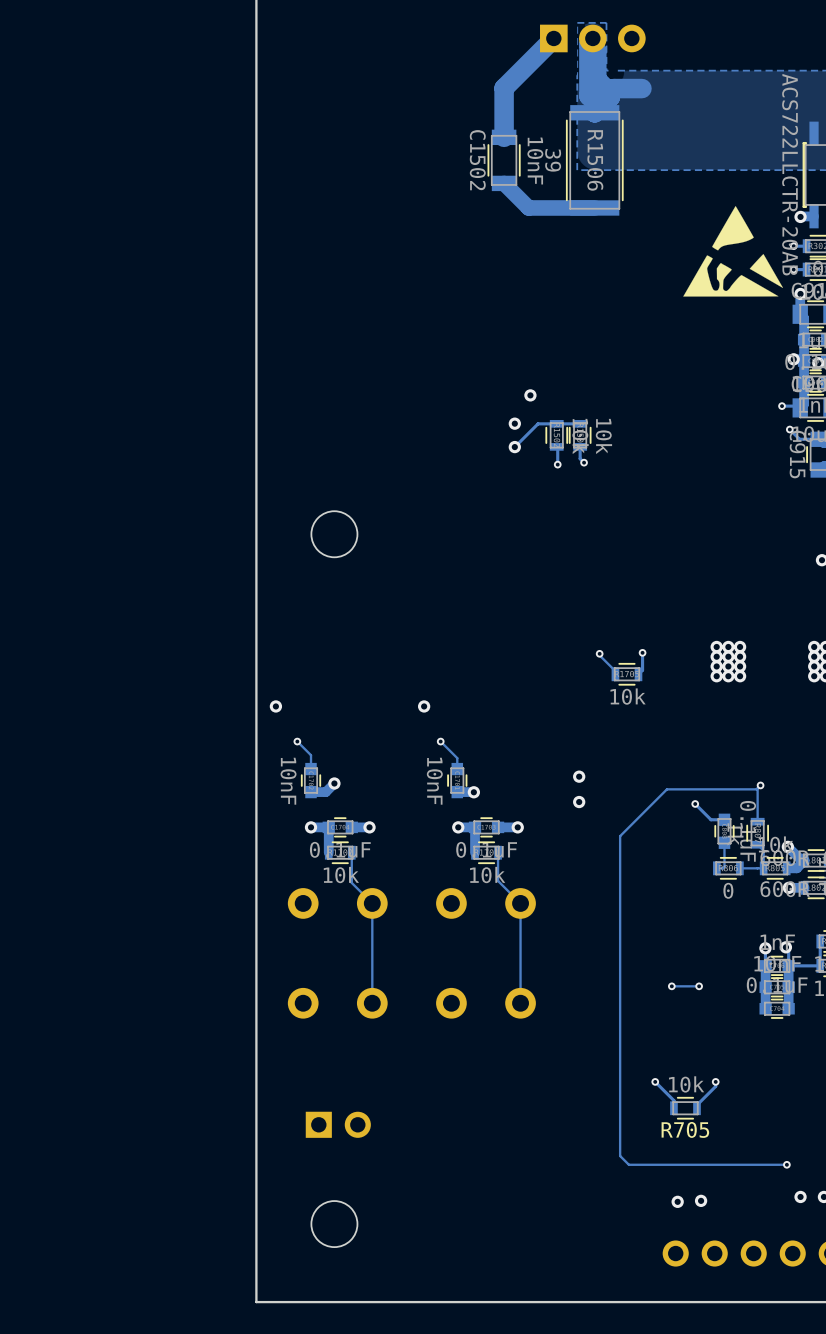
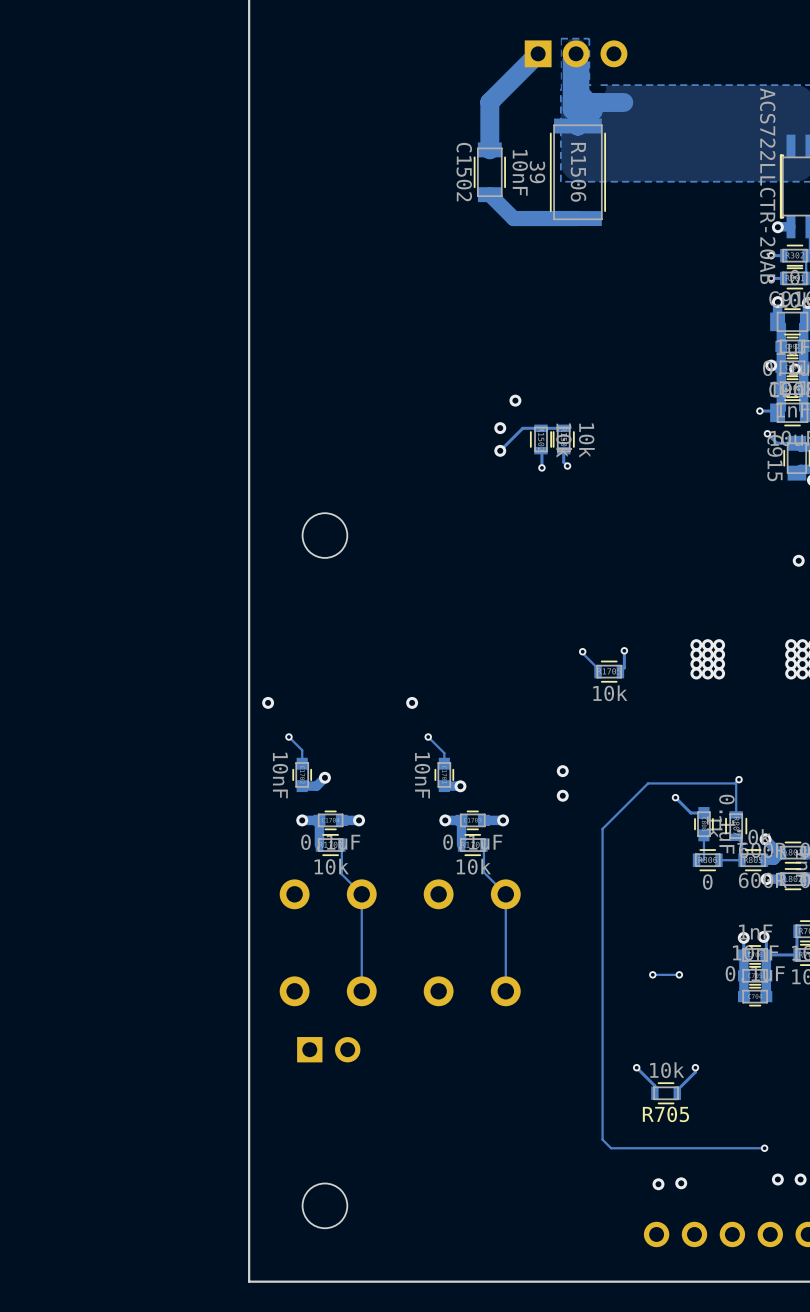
drawing: [683, 206, 784, 297] -> none
part position: (338, 1124) -> (328, 1049)

